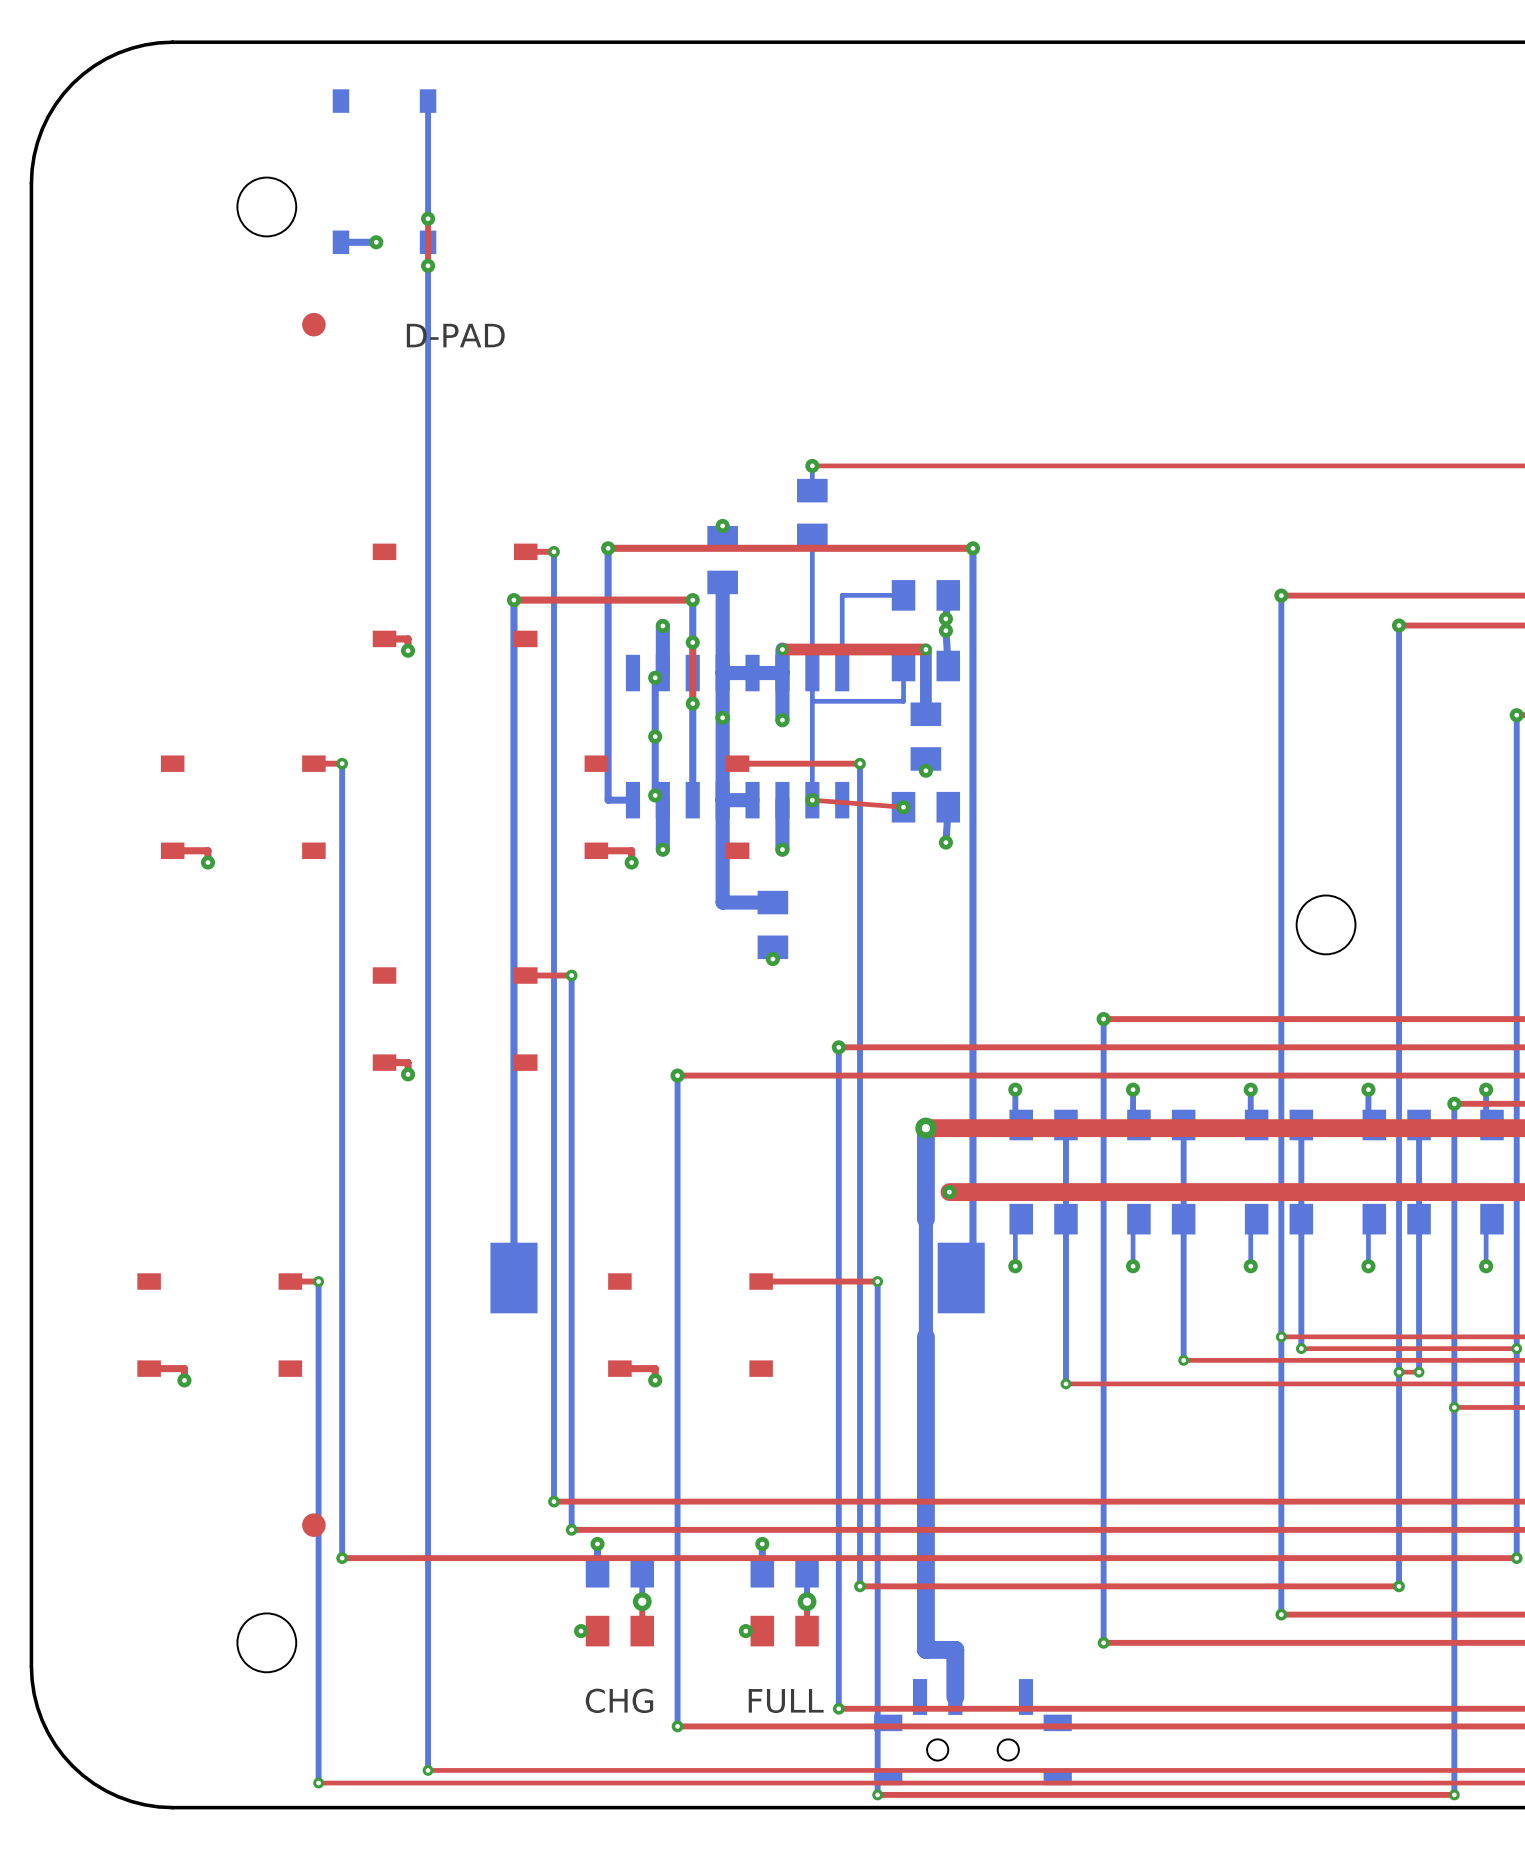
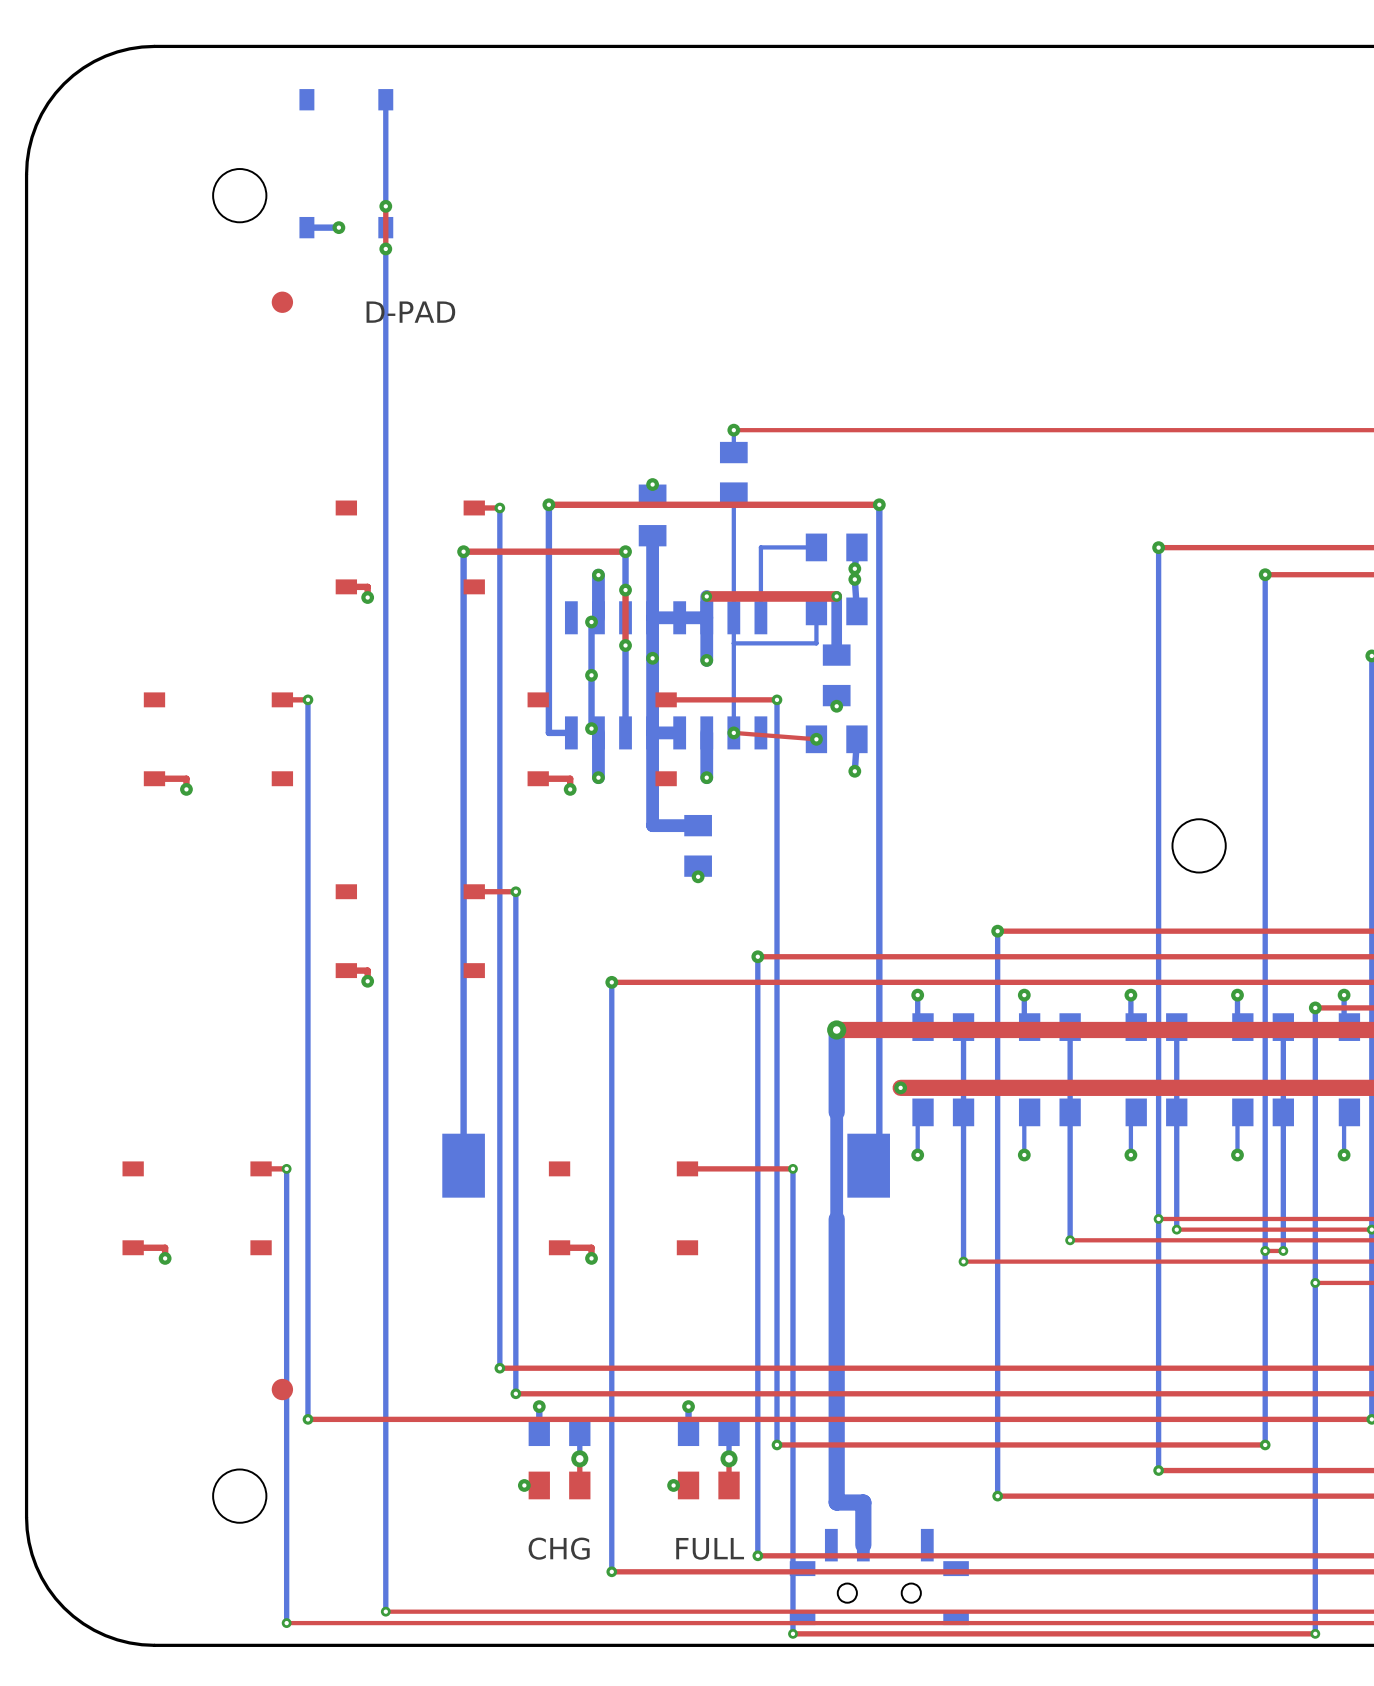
top track: (949, 1192) (996, 1192) -> none
via position: (949, 1192) -> (900, 1087)

